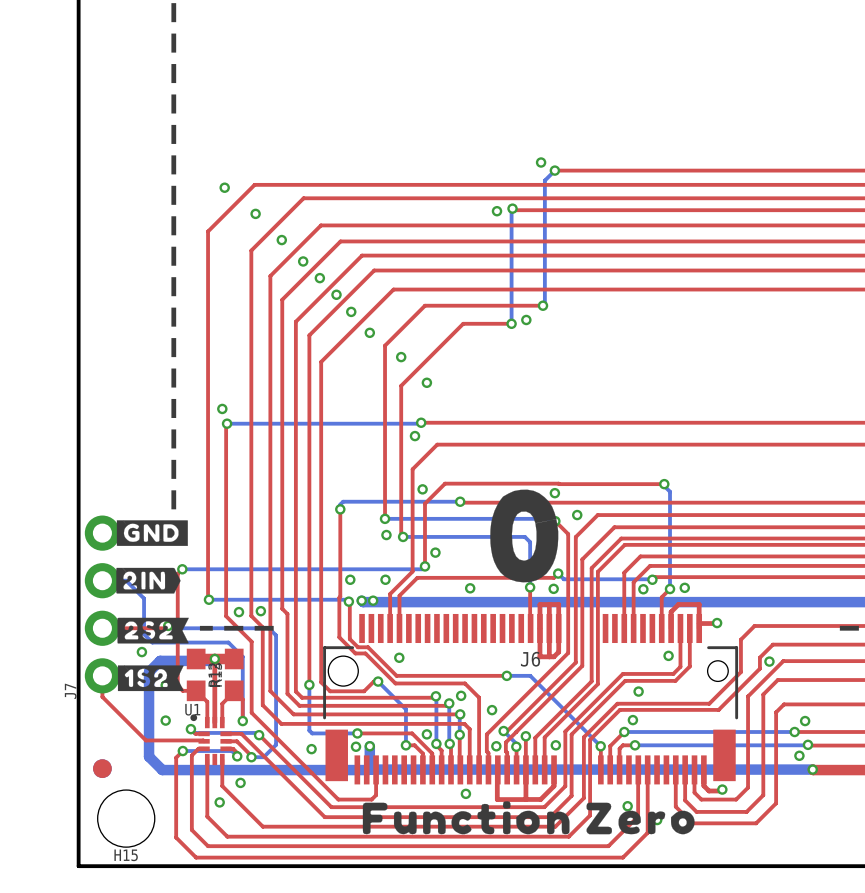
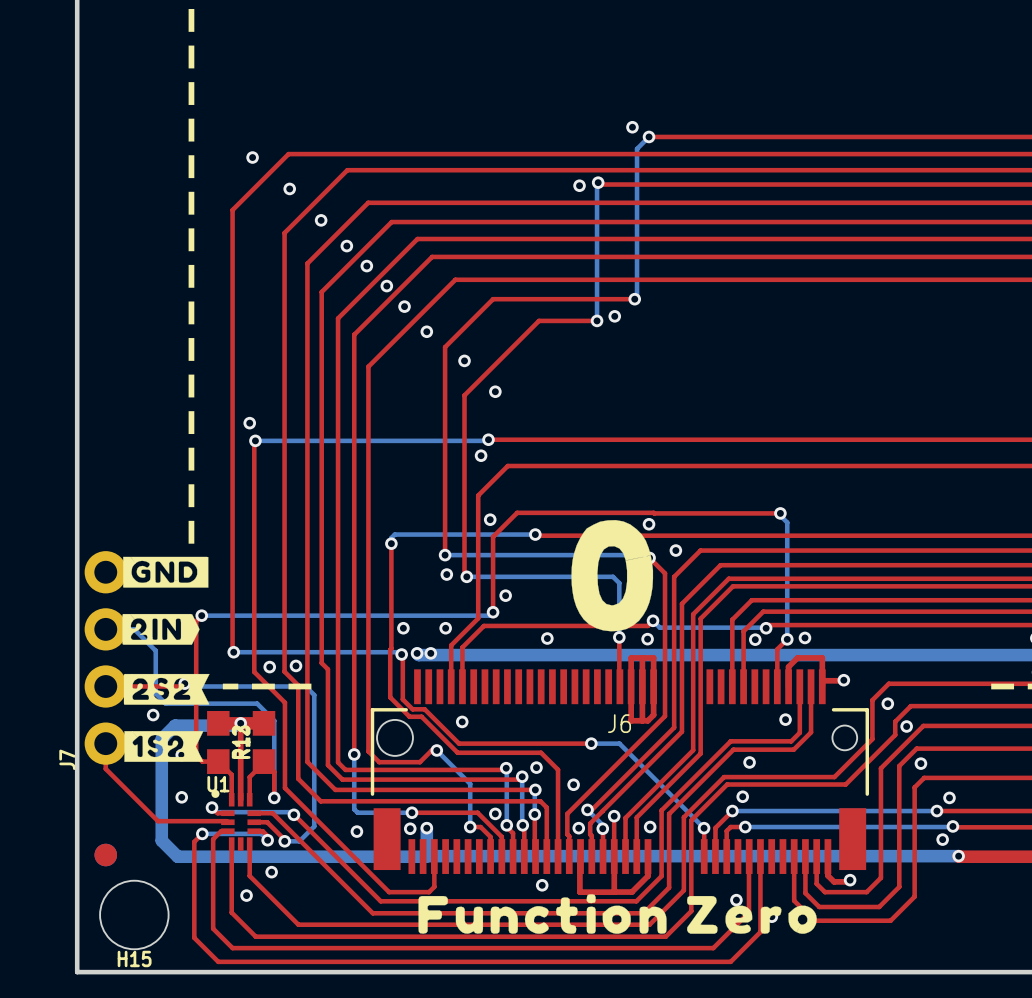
via: none -> (887, 703)
via: none -> (920, 763)

